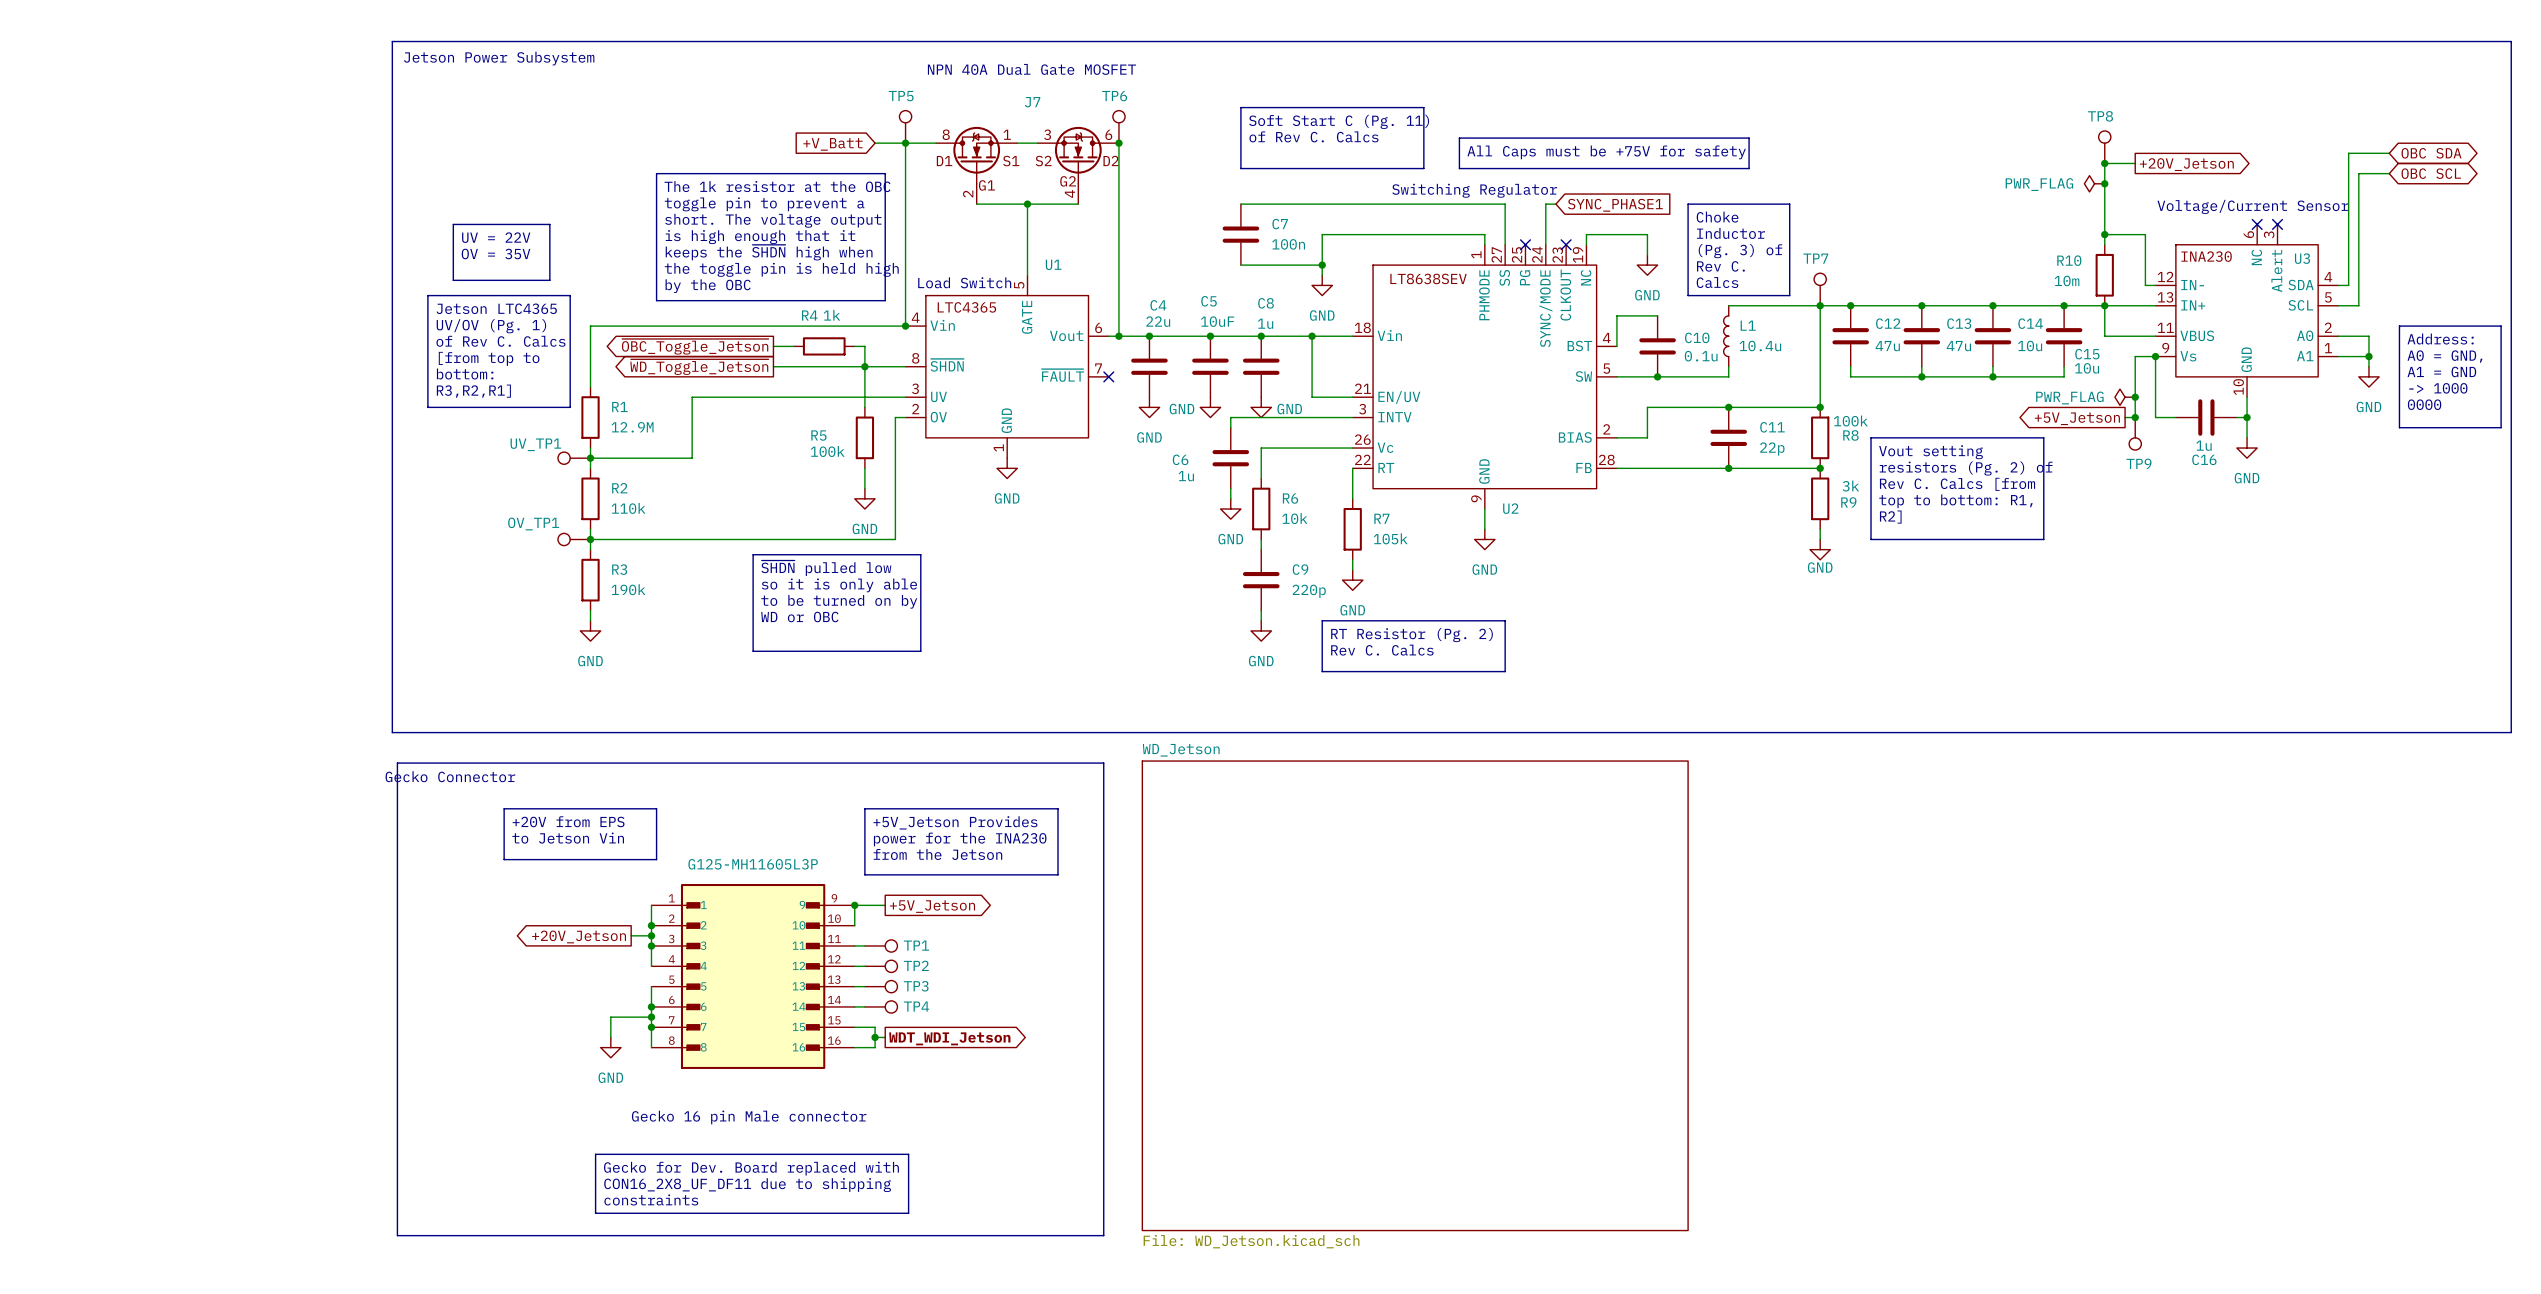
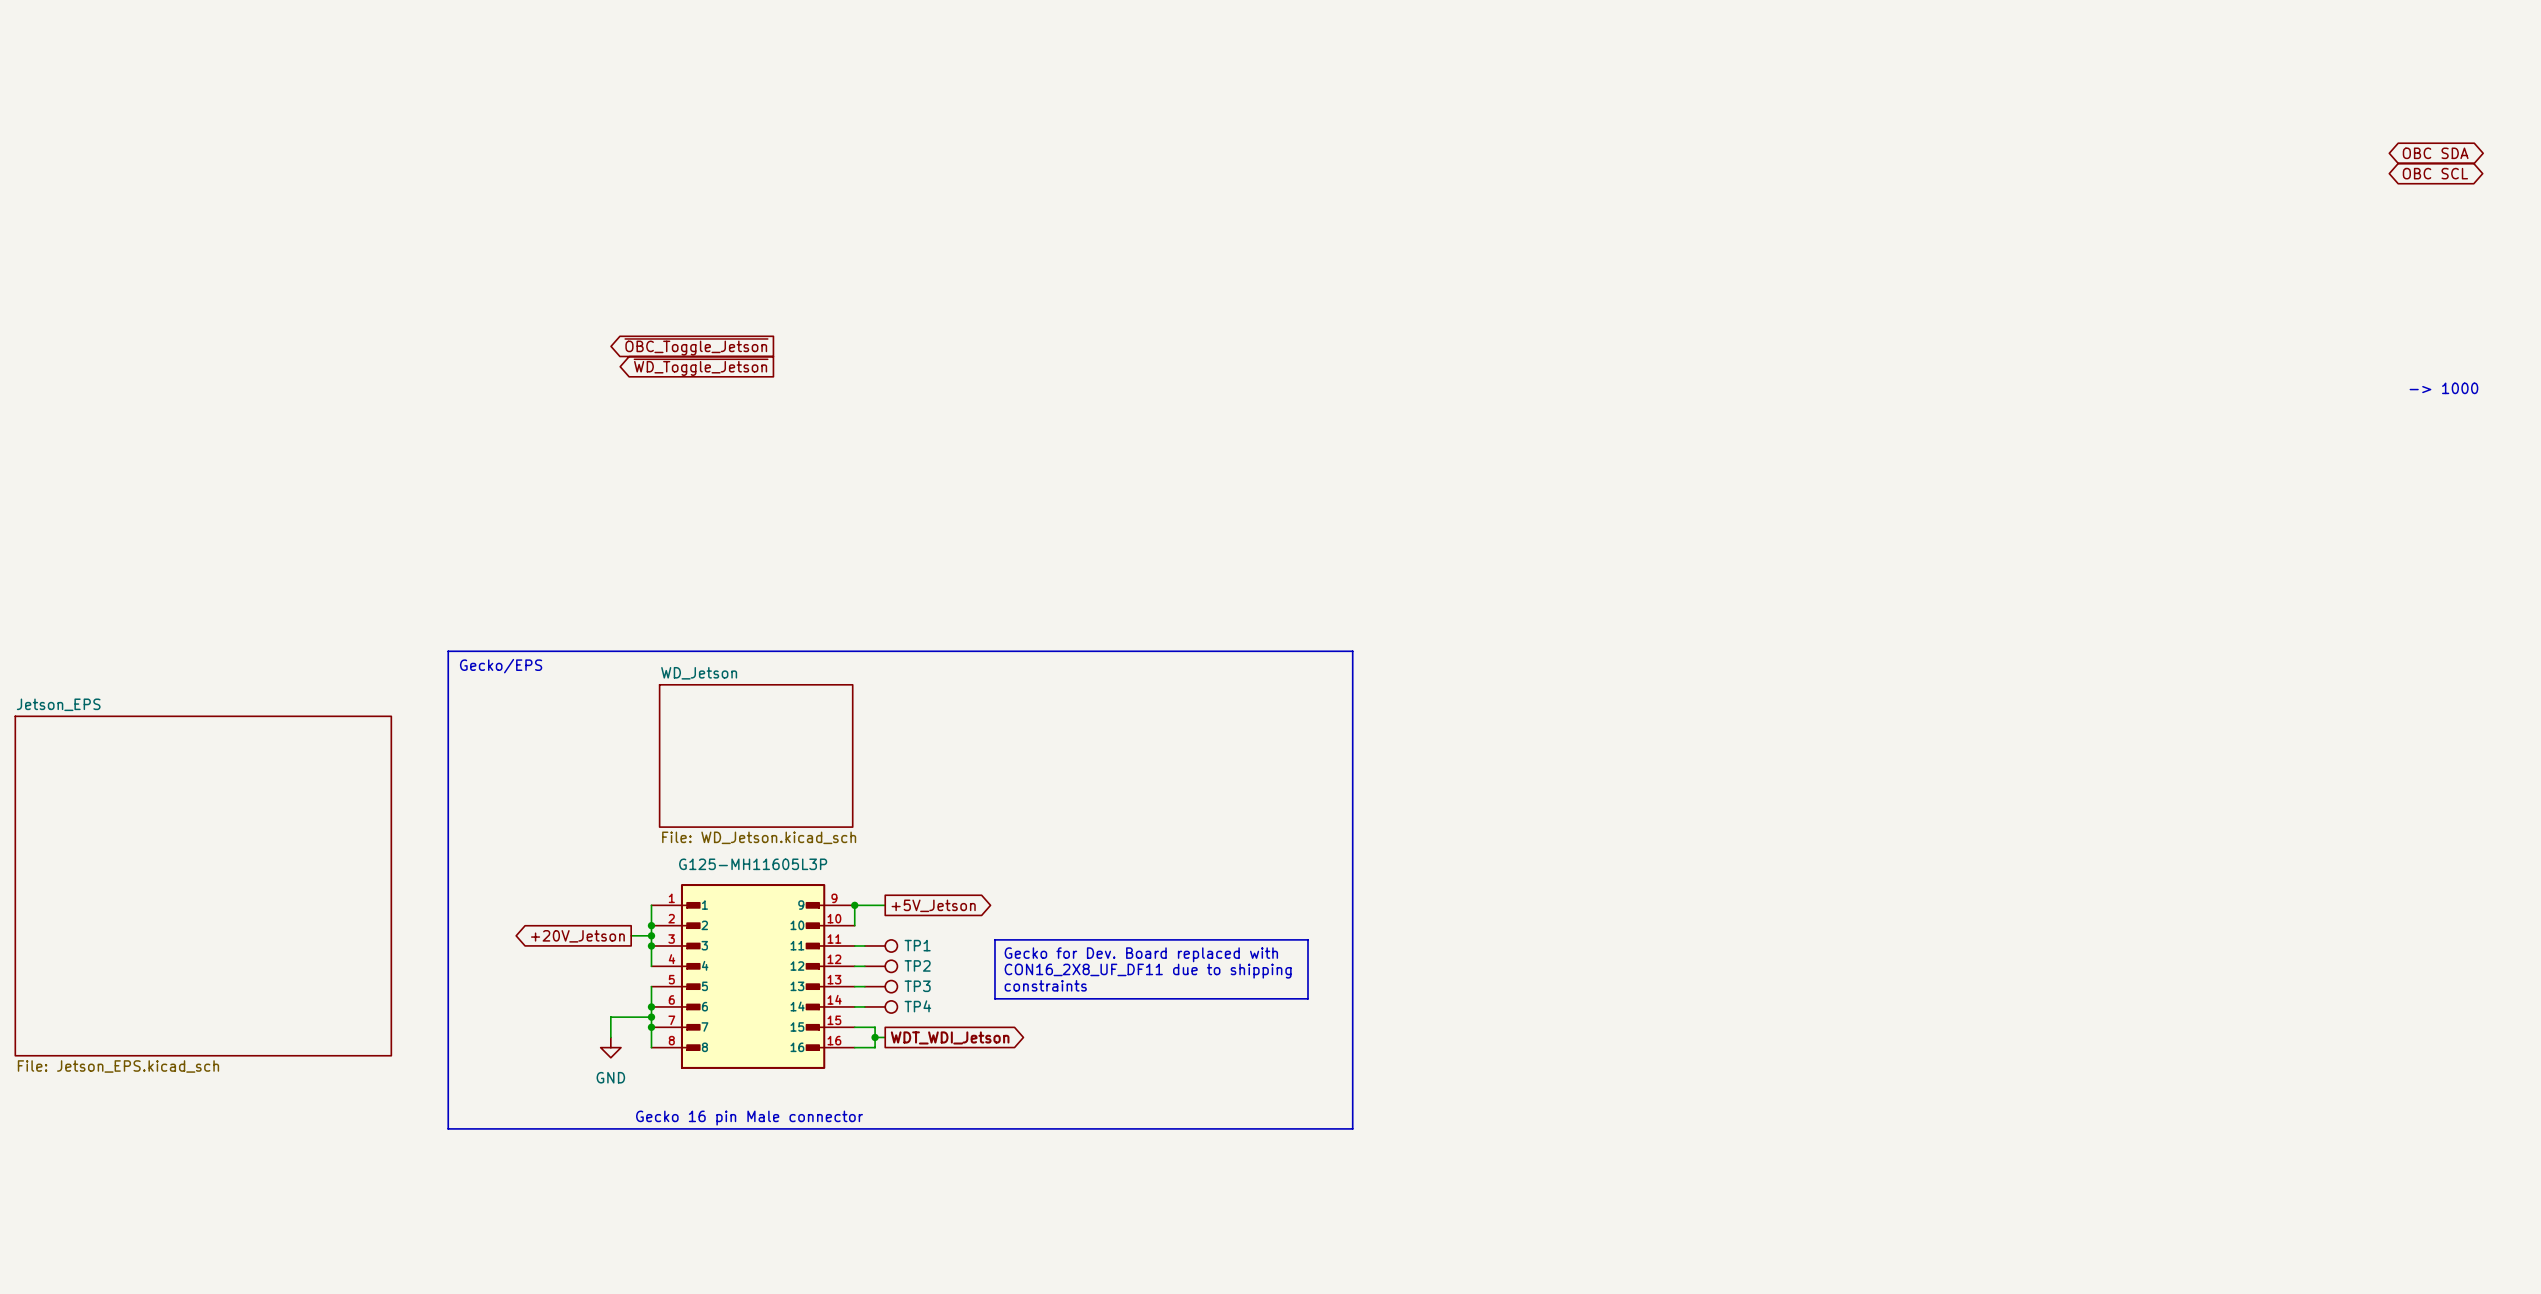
line: (392, 41) (2511, 41) (2511, 732) (392, 732) (392, 41) -> none
text: Jetson Power Subsystem (499, 58) -> none
text: NPN 40A Dual Gate MOSFET (1031, 69) -> none
line: (1240, 107) (1423, 107) (1423, 168) (1240, 168) (1240, 107) -> none
text: Soft Start C (Pg. 11) (1339, 121) -> none
TP5: (905, 126) -> none
TP6: (1118, 126) -> none
text: of Rev C. Calcs (1313, 136) -> none
line: (1459, 138) (1749, 138) (1749, 168) (1459, 168) (1459, 138) -> none
wire: (875, 143) (936, 143) -> none
wire: (905, 143) (905, 326) (590, 326) (590, 387) -> none
junction: (905, 143) -> none
wire: (1017, 143) (1037, 143) -> none
wire: (1118, 143) (1118, 336) -> none
junction: (1118, 143) -> none
global label: +V_Batt (832, 144) -> none
TP8: (2104, 147) -> none
text: All Caps must be +75V for safety (1606, 152) -> none
wire: (2389, 153) (2348, 153) (2348, 285) (2338, 285) -> none
junction: (2104, 163) -> none
wire: (2135, 163) (2104, 163) (2104, 244) -> none
global label: +20V_Jetson (2186, 164) -> none
J7: (1027, 165) -> none
line: (656, 173) (656, 300) (885, 300) (885, 173) (656, 173) -> none
wire: (2389, 173) (2358, 173) (2358, 305) (2338, 305) -> none
power symbol: PWR_FLAG (2094, 183) -> none
junction: (2104, 183) -> none
text: The 1k resistor at the OBC (777, 186) -> none
text: Switching Regulator (1474, 190) -> none
text: toggle pin to prevent a (764, 204) -> none
wire: (976, 204) (1078, 204) -> none
wire: (1027, 204) (1027, 275) -> none
junction: (1027, 204) -> none
wire: (1240, 204) (1505, 204) (1505, 244) -> none
wire: (1555, 204) (1545, 204) (1545, 244) -> none
line: (1688, 204) (1789, 204) (1789, 295) (1688, 295) (1688, 204) -> none
global label: SYNC_PHASE1 (1615, 205) -> none
text: Voltage/Current Sensor (2253, 206) -> none
text: Choke (1717, 217) -> none
text: short. The voltage output (773, 220) -> none
line: (453, 224) (549, 224) (549, 280) (453, 280) (453, 224) -> none
no-connect mark: (2257, 224) -> none
no-connect mark: (2277, 224) -> none
text: Inductor (1730, 233) -> none
C7: 100n (1240, 234) -> none
wire: (2104, 234) (2145, 234) (2145, 285) (2155, 285) -> none
junction: (2104, 234) -> none
text: UV = 22V (496, 237) -> none
text: is high enough that it (760, 237) -> none
wire: (1484, 244) (1484, 234) (1322, 234) (1322, 275) -> none
no-connect mark: (1525, 244) -> none
no-connect mark: (1566, 244) -> none
wire: (1586, 244) (1586, 234) (1647, 234) (1647, 254) -> none
text: (Pg. 3) of (1740, 251) -> none
text: keeps the ~{SHDN} high when (769, 252) -> none
text: OV = 35V (496, 254) -> none
wire: (1240, 265) (1322, 265) -> none
junction: (1322, 265) -> none
power symbol: GND (1647, 265) -> none
text: Rev C. (1720, 266) -> none
text: the toggle pin is held high (781, 269) -> none
R10: 10m (2104, 275) -> none
text: Load Switch (964, 282) -> none
text: Calcs (1717, 282) -> none
power symbol: GND (1322, 285) -> none
text: by the OBC (708, 286) -> none
TP7: (1820, 289) -> none
line: (427, 295) (570, 295) (570, 407) (427, 407) (427, 295) -> none
wire: (1728, 305) (2155, 305) -> none
wire: (1820, 305) (1820, 407) (1647, 407) (1647, 437) (1616, 437) -> none
junction: (1820, 305) -> none
junction: (1850, 305) -> none
junction: (1921, 305) -> none
junction: (1992, 305) -> none
junction: (2064, 305) -> none
wire: (2104, 305) (2104, 336) (2155, 336) -> none
junction: (2104, 305) -> none
text: Jetson LTC4365 (496, 308) -> none
U3: (2247, 310) -> none
wire: (1657, 315) (1616, 315) (1616, 346) -> none
text: UV/OV (Pg. 1) (491, 326) -> none
junction: (905, 326) -> none
line: (2399, 326) (2501, 326) (2501, 427) (2399, 427) (2399, 326) -> none
wire: (1108, 336) (1352, 336) -> none
junction: (1118, 336) -> none
junction: (1149, 336) -> none
junction: (1210, 336) -> none
junction: (1261, 336) -> none
wire: (1312, 336) (1312, 397) (1352, 397) -> none
junction: (1312, 336) -> none
L1: 10.4u (1726, 336) -> none
C12: 47u (1850, 336) -> none
C13: 47u (1921, 336) -> none
C14: 10u (1992, 336) -> none
C15: 10u (2064, 336) -> none
wire: (2338, 336) (2368, 336) (2368, 366) -> none
text: Address: (2440, 339) -> none
text: of Rev C. Calcs (500, 341) -> none
wire: (773, 346) (793, 346) -> none
R4: 1k (824, 346) -> none
wire: (854, 346) (864, 346) (864, 407) -> none
C10: 0.1u (1657, 346) -> none
junction: (2155, 356) -> none
wire: (2338, 356) (2368, 356) -> none
junction: (2368, 356) -> none
text: A0 = GND, (2445, 356) -> none
text: [from top to (489, 358) -> none
wire: (773, 366) (905, 366) -> none
junction: (864, 366) -> none
U1: (1007, 366) -> none
C4: 22u (1149, 366) -> none
C5: 10uF (1210, 366) -> none
C8: 1u (1261, 366) -> none
wire: (1728, 366) (1728, 376) (1616, 376) -> none
wire: (1850, 366) (1850, 376) (2064, 376) (2064, 366) -> none
wire: (1921, 366) (1921, 376) -> none
wire: (1992, 366) (1992, 376) -> none
text: A1 = GND (2441, 371) -> none
text: bottom: (465, 374) -> none
no-connect mark: (1108, 376) -> none
U2: (1484, 376) -> none
junction: (1657, 376) -> none
junction: (1921, 376) -> none
junction: (1992, 376) -> none
power symbol: GND (2368, 376) -> none
text: R3,R2,R1] (473, 391) -> none
wire: (905, 397) (692, 397) (692, 458) (590, 458) -> none
power symbol: PWR_FLAG (2125, 397) -> none
junction: (2135, 397) -> none
wire: (2247, 397) (2247, 437) -> none
text: 0000 (2424, 404) -> none
power symbol: GND (1149, 407) -> none
power symbol: GND (1210, 407) -> none
power symbol: GND (1261, 407) -> none
junction: (1728, 407) -> none
junction: (1820, 407) -> none
R1: 12.9M (590, 417) -> none
wire: (905, 417) (895, 417) (895, 539) (590, 539) -> none
wire: (1352, 417) (1230, 417) (1230, 427) -> none
wire: (2125, 417) (2135, 417) (2135, 356) (2155, 356) (2155, 417) (2175, 417) -> none
junction: (2135, 417) -> none
C16: 1u (2206, 417) -> none
wire: (2236, 417) (2247, 417) -> none
junction: (2247, 417) -> none
global label: +5V_Jetson (2077, 418) -> none
TP9: (2135, 433) -> none
R5: 100k (864, 437) -> none
C11: 22p (1728, 437) -> none
R8: 100k (1820, 437) -> none
line: (1871, 437) (2043, 437) (2043, 539) (1871, 539) (1871, 437) -> none
wire: (590, 448) (590, 468) -> none
wire: (1352, 448) (1261, 448) (1261, 478) -> none
power symbol: GND (2247, 448) -> none
text: Vout setting (1931, 452) -> none
UV_TP1: (574, 458) -> none
junction: (590, 458) -> none
C6: 1u (1230, 458) -> none
wire: (864, 468) (864, 488) -> none
power symbol: GND (1007, 468) -> none
wire: (1352, 468) (1352, 498) -> none
wire: (1616, 468) (1820, 468) -> none
junction: (1728, 468) -> none
junction: (1820, 468) -> none
text: resistors (Pg. 2) of (1966, 468) -> none
text: Rev C. Calcs [from (1957, 484) -> none
wire: (1230, 488) (1230, 498) -> none
R2: 110k (590, 498) -> none
power symbol: GND (864, 498) -> none
R9: 3k (1820, 498) -> none
text: top to bottom: R1, (1955, 501) -> none
power symbol: GND (1230, 509) -> none
R6: 10k (1261, 509) -> none
wire: (1484, 509) (1484, 529) -> none
text: R2] (1890, 517) -> none
wire: (590, 529) (590, 549) -> none
R7: 105k (1352, 529) -> none
wire: (1820, 529) (1820, 539) -> none
OV_TP1: (574, 539) -> none
junction: (590, 539) -> none
wire: (1261, 539) (1261, 549) -> none
power symbol: GND (1484, 539) -> none
power symbol: GND (1820, 549) -> none
wire: (1352, 559) (1352, 569) -> none
text: ~{SHDN} pulled low (826, 568) -> none
R3: 190k (590, 580) -> none
C9: 220p (1261, 580) -> none
power symbol: GND (1352, 580) -> none
text: so it is only able (839, 585) -> none
text: to be turned on by (839, 601) -> none
wire: (590, 610) (590, 620) -> none
wire: (1261, 610) (1261, 620) -> none
text: WD or OBC (799, 617) -> none
line: (1322, 620) (1505, 620) (1505, 671) (1322, 671) (1322, 620) -> none
power symbol: GND (590, 630) -> none
power symbol: GND (1261, 630) -> none
text: RT Resistor (Pg. 2) (1412, 635) -> none
text: Rev C. Calcs (1382, 650) -> none
line: (753, 651) (753, 554) (920, 554) (920, 651) -> (753, 651) (448, 651) (448, 1128) (1352, 1128) (1352, 651) (920, 651)
text: none -> Gecko/EPS (501, 666)
sheet WD_Jetson: none -> File: WD_Jetson.kicad_sch (756, 755)
line: (397, 763) (1103, 763) (1103, 1235) (397, 1235) (397, 763) -> none
text: Gecko Connector (450, 776) -> none
line: (504, 808) (656, 808) (656, 859) (504, 859) (504, 808) -> none
line: (864, 808) (1057, 808) (1057, 874) (864, 874) (864, 808) -> none
text: +20V from EPS (568, 821) -> none
text: +5V_Jetson Provides (955, 822) -> none
text: to Jetson Vin (568, 838) -> none
text: power for the INA230 (960, 839) -> none
text: from the Jetson (937, 854) -> none
sheet Jetson_EPS: none -> File: Jetson_EPS.kicad_sch (203, 886)
line: none -> (994, 939) (1307, 939) (1307, 998) (994, 998) (994, 939)
text: none -> Gecko for Dev. Board replaced with (1141, 954)
text: none -> CON16_2X8_UF_DF11 due to shipping (1148, 971)
text: none -> constraints (1045, 985)
sheet WD_Jetson: File: WD_Jetson.kicad_sch (1415, 995) -> none
line: (595, 1154) (908, 1154) (908, 1213) (595, 1213) (595, 1154) -> none
text: Gecko for Dev. Board replaced with (751, 1168) -> none
text: CON16_2X8_UF_DF11 due to shipping (747, 1185) -> none
text: constraints (651, 1199) -> none

